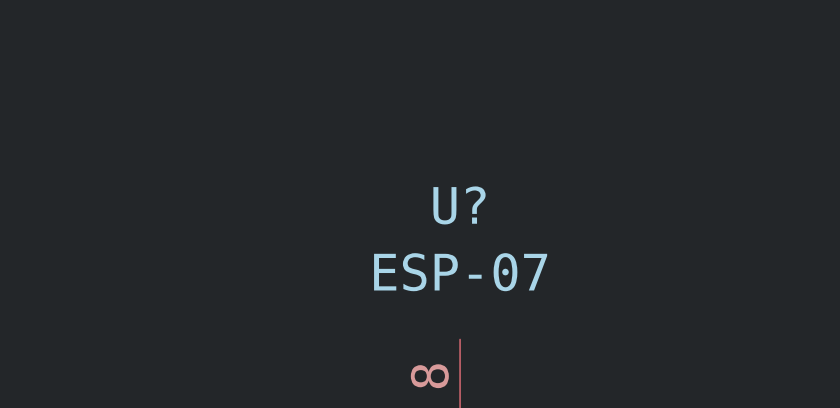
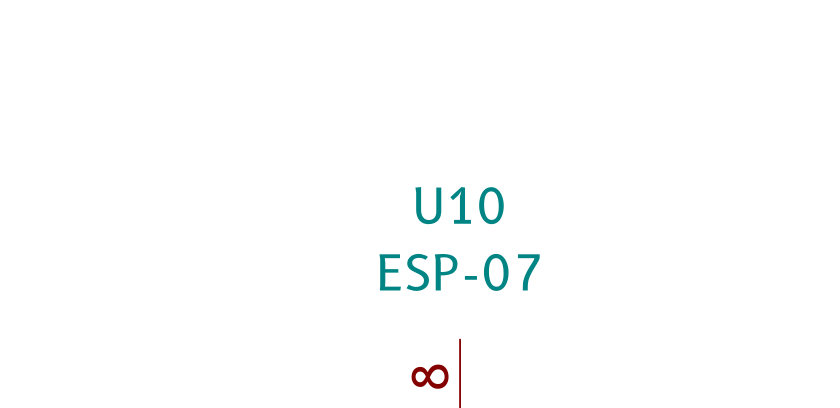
U? name: U? (459, 205) -> U10 (459, 205)

